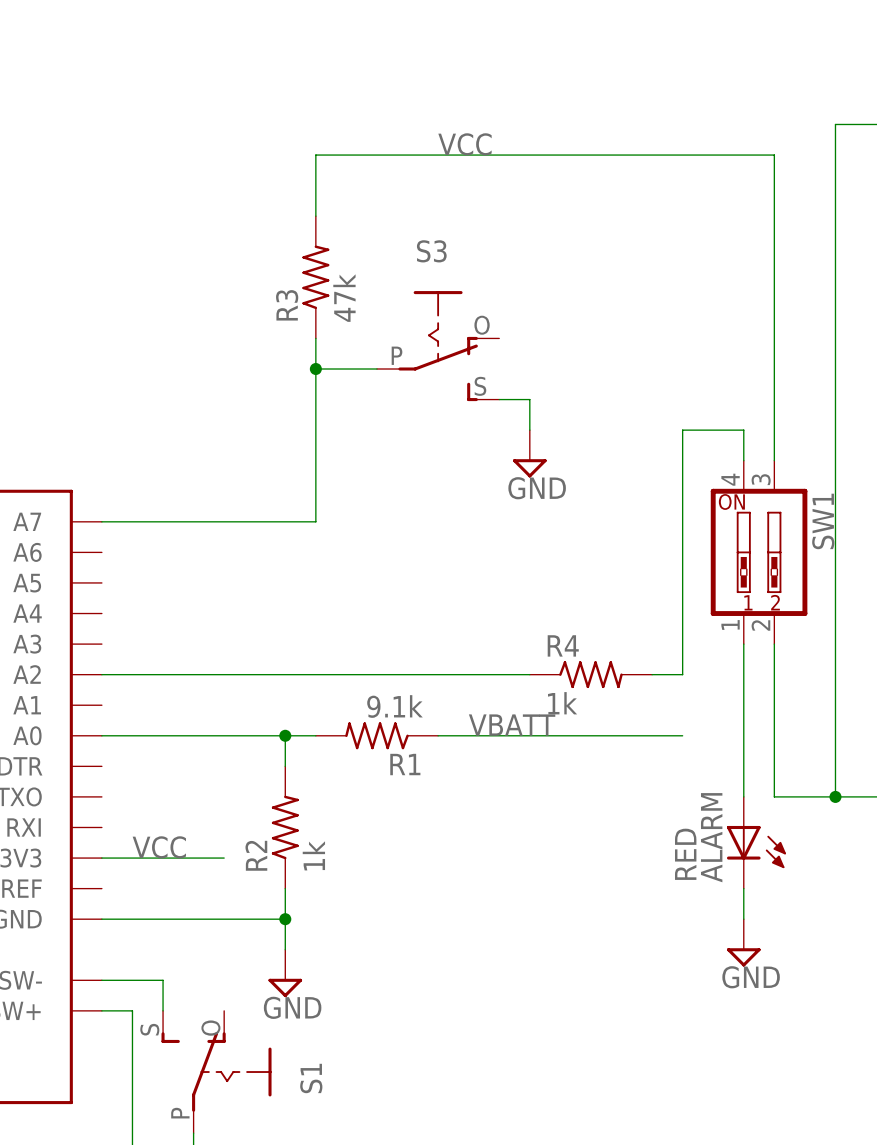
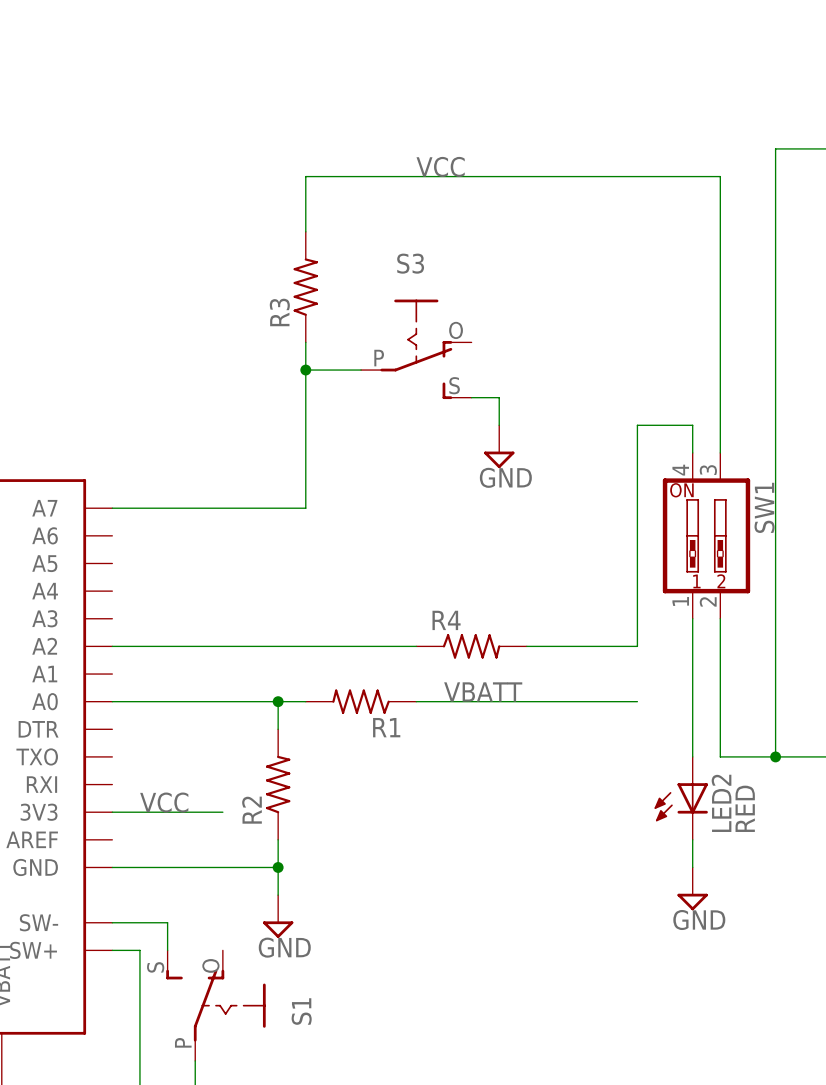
R3 value: 47k (344, 298) -> none
R4 position: (590, 674) -> (471, 646)
R4 value: 1k (562, 703) -> none
R1 value: 9.1k (394, 706) -> none
LED2: none -> RED (681, 798)
ALARM: RED (756, 842) -> none
R2 value: 1k (313, 855) -> none

